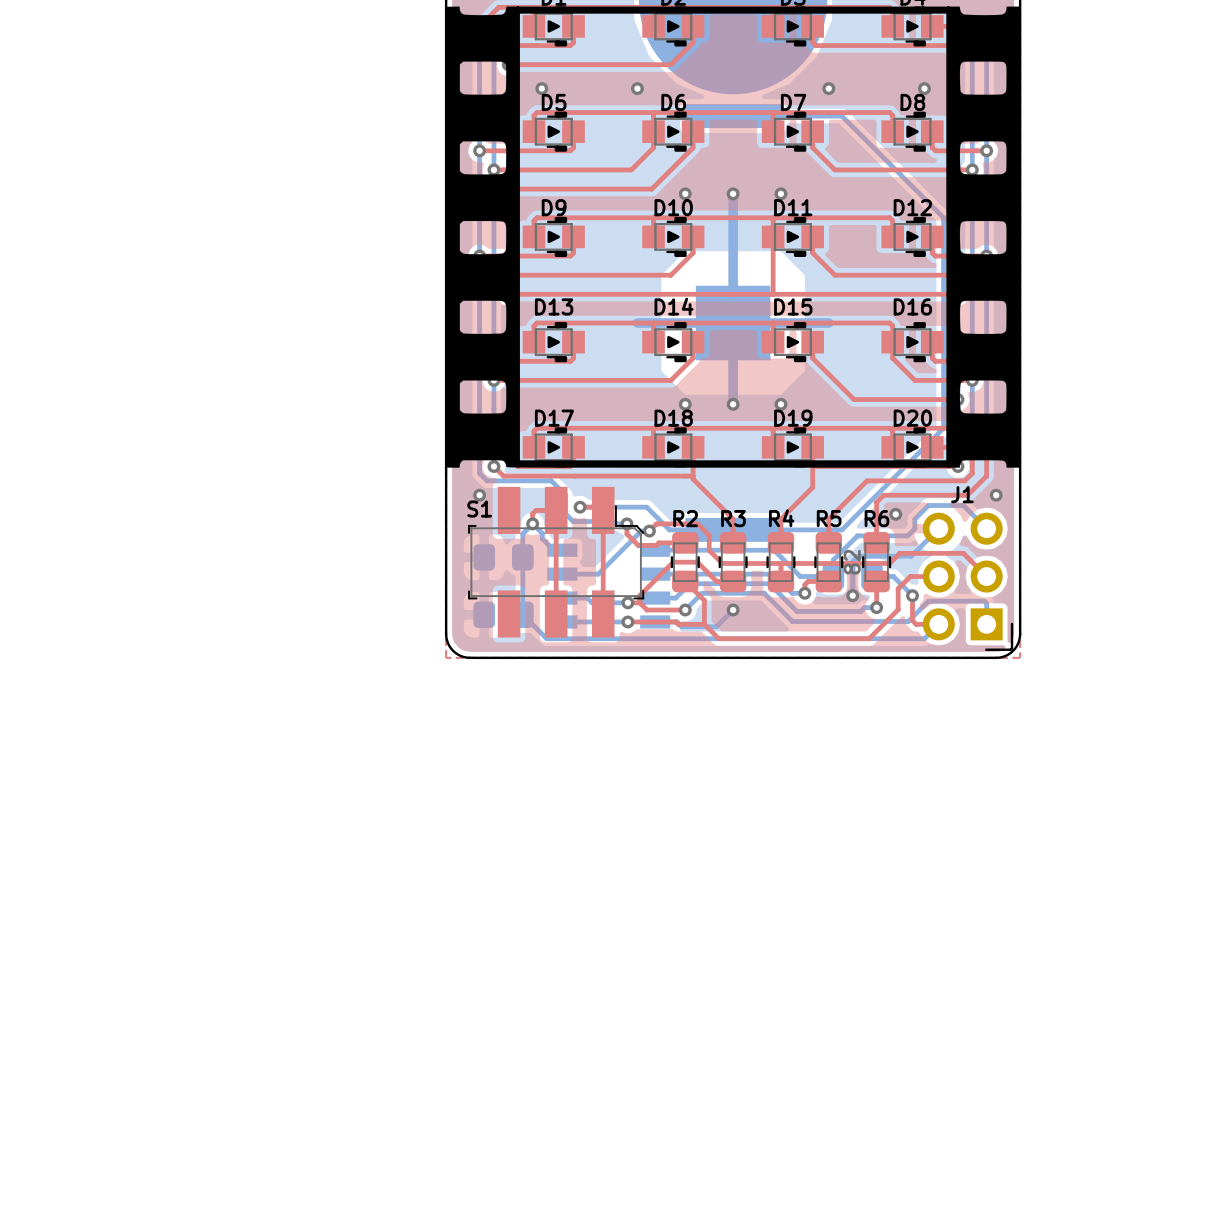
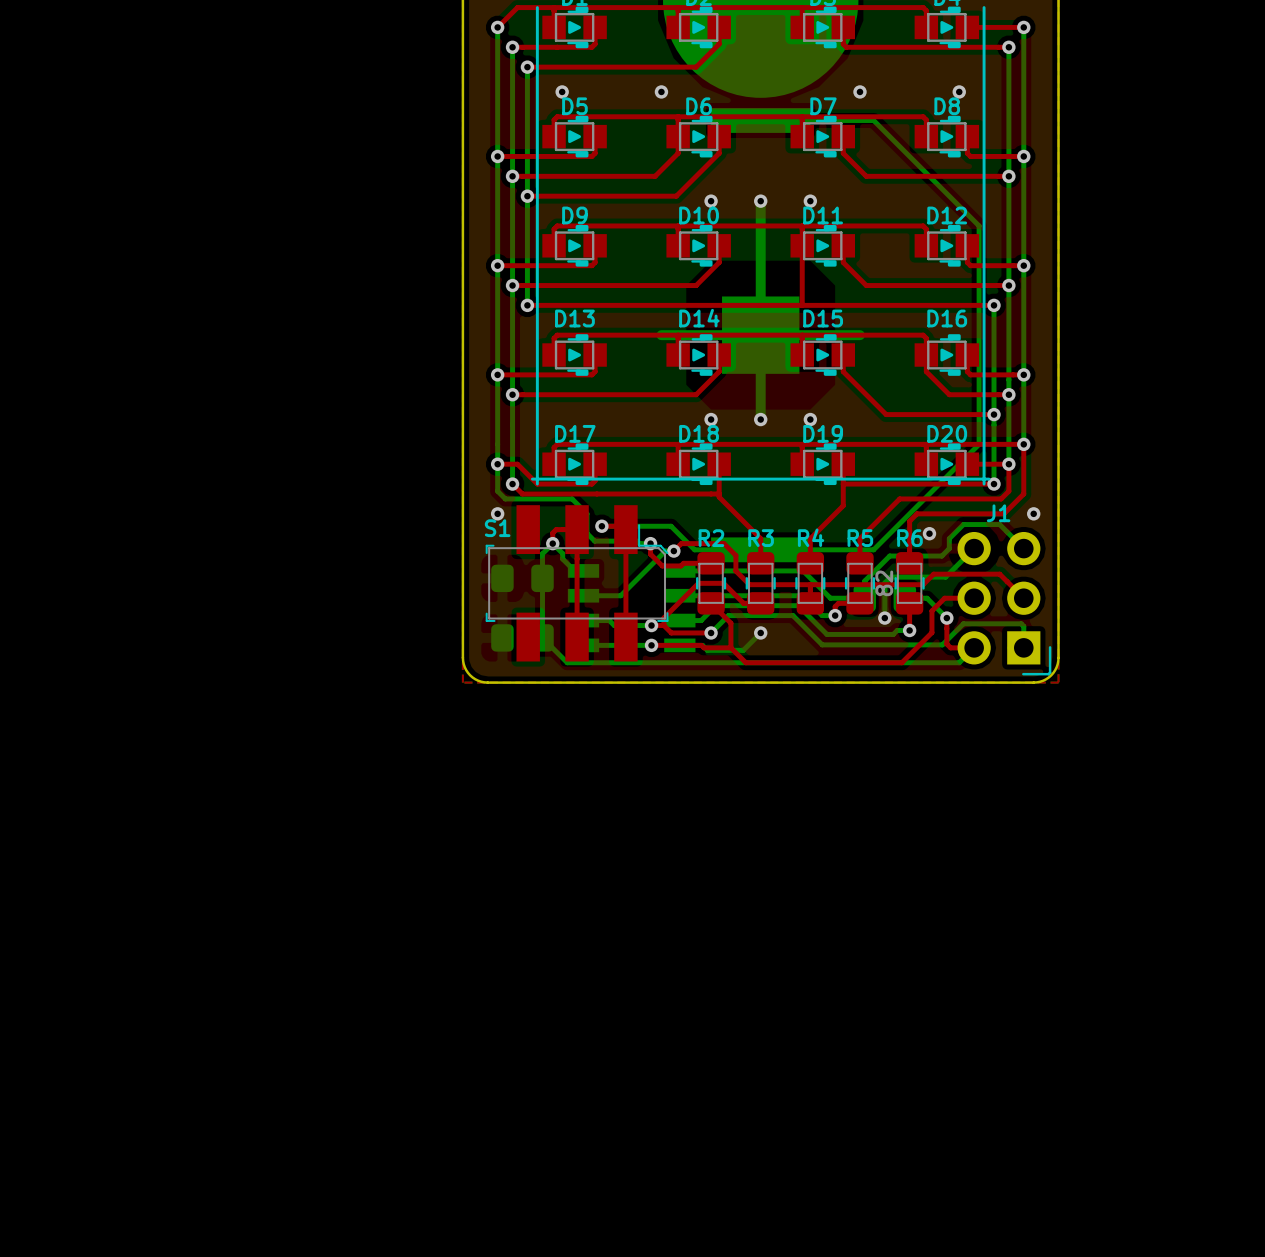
drawing: [446, 6, 1021, 468] -> none

